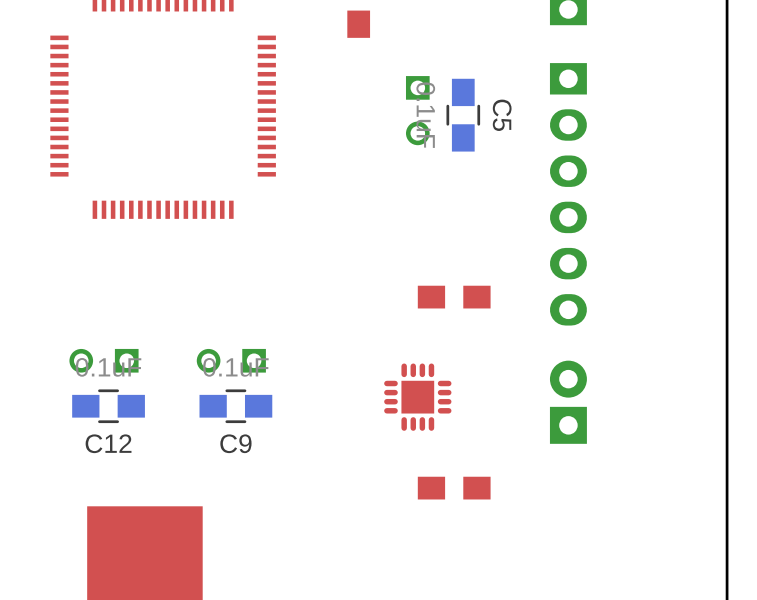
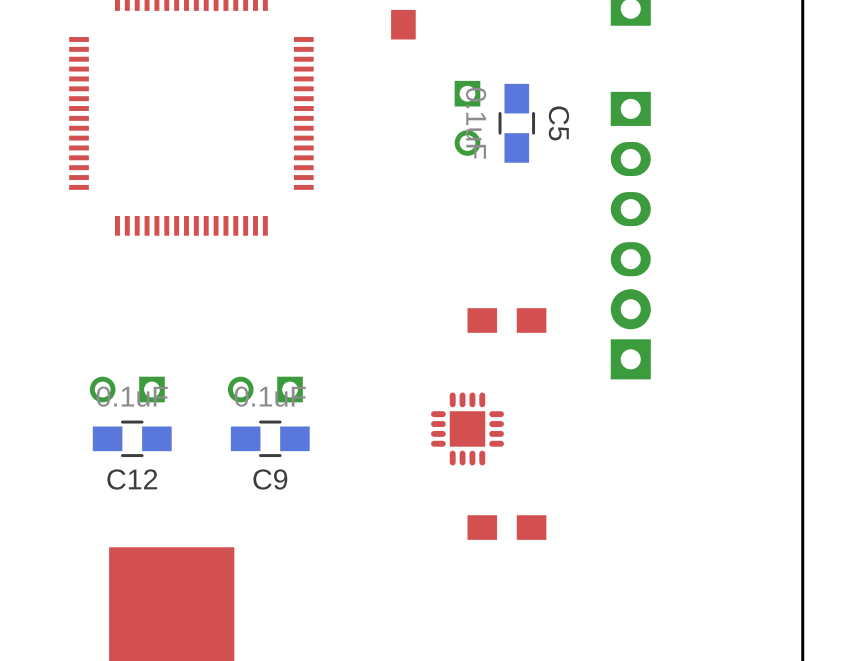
part: none -> (630, 184)
part: (568, 194) -> none
part position: (568, 402) -> (630, 334)

